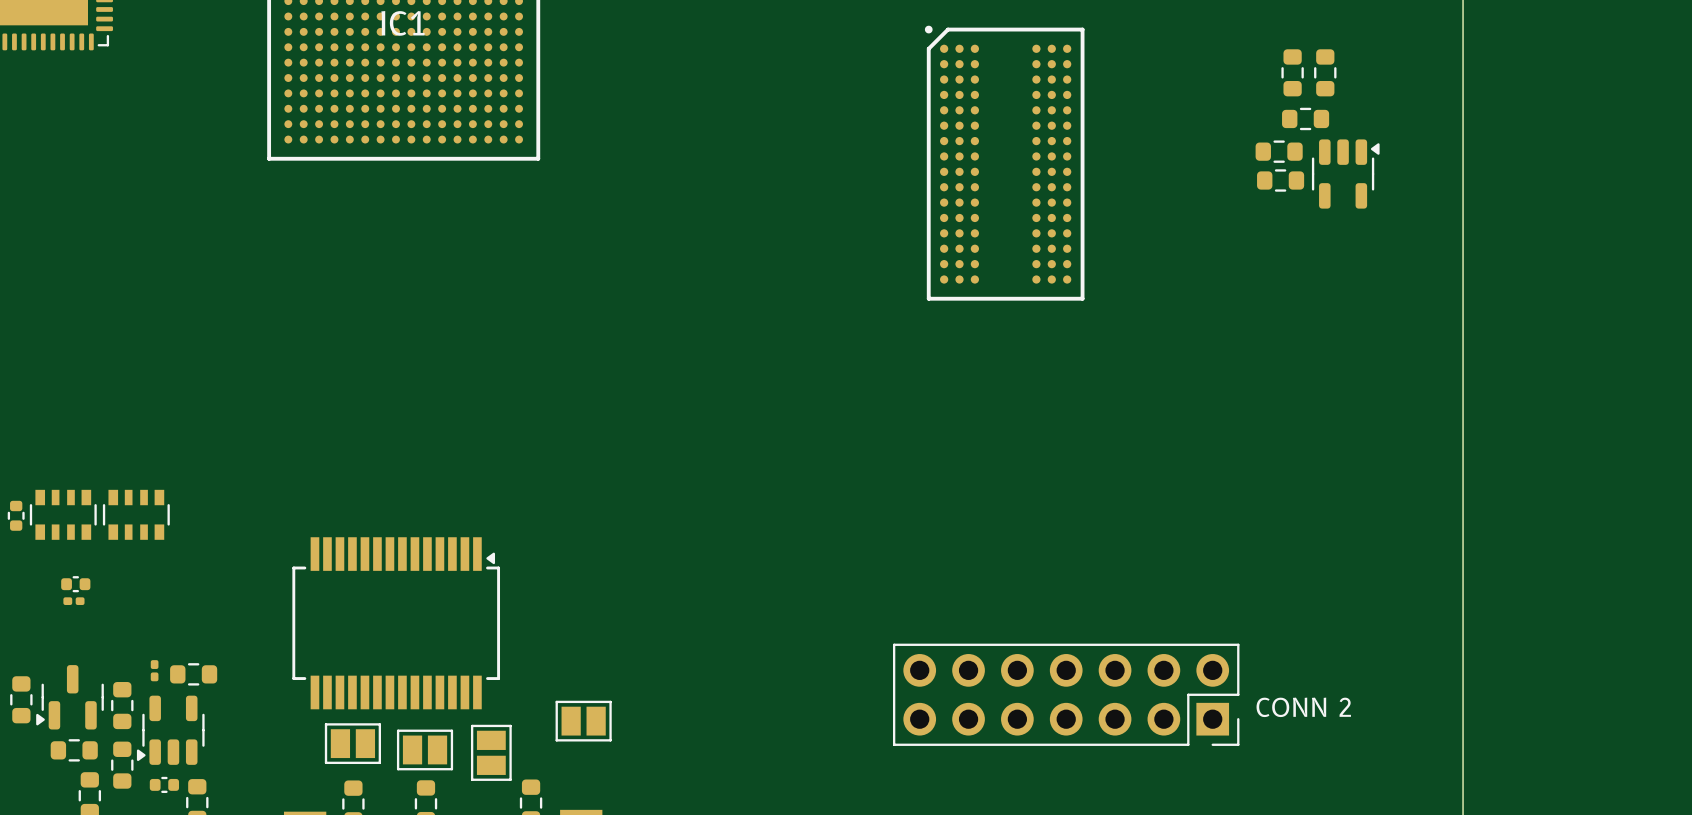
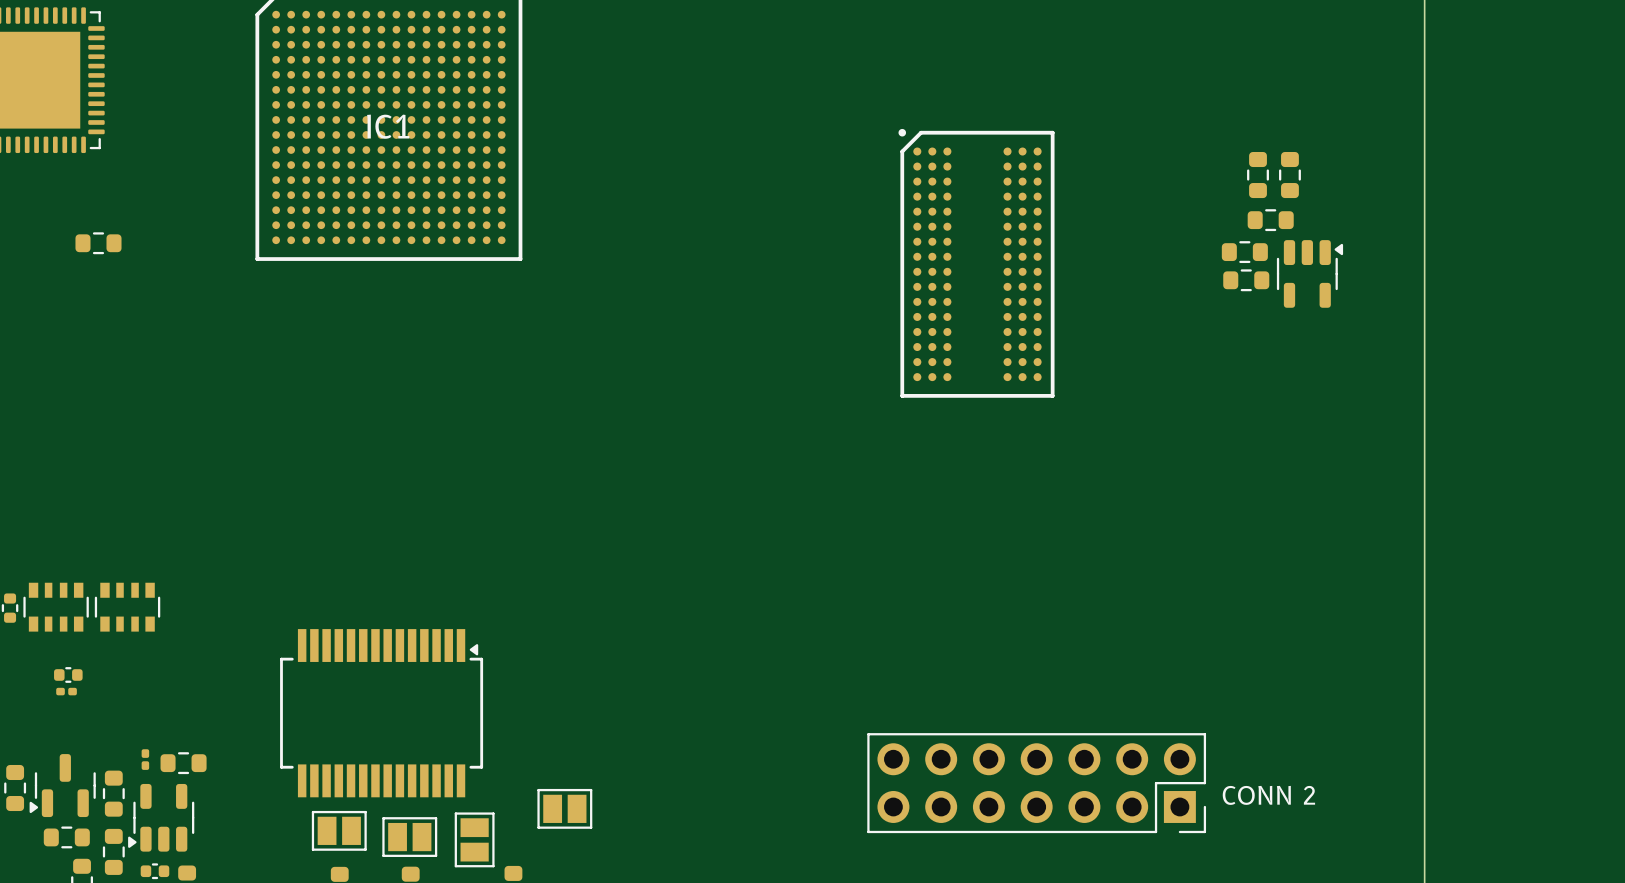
part: none -> (98, 243)

